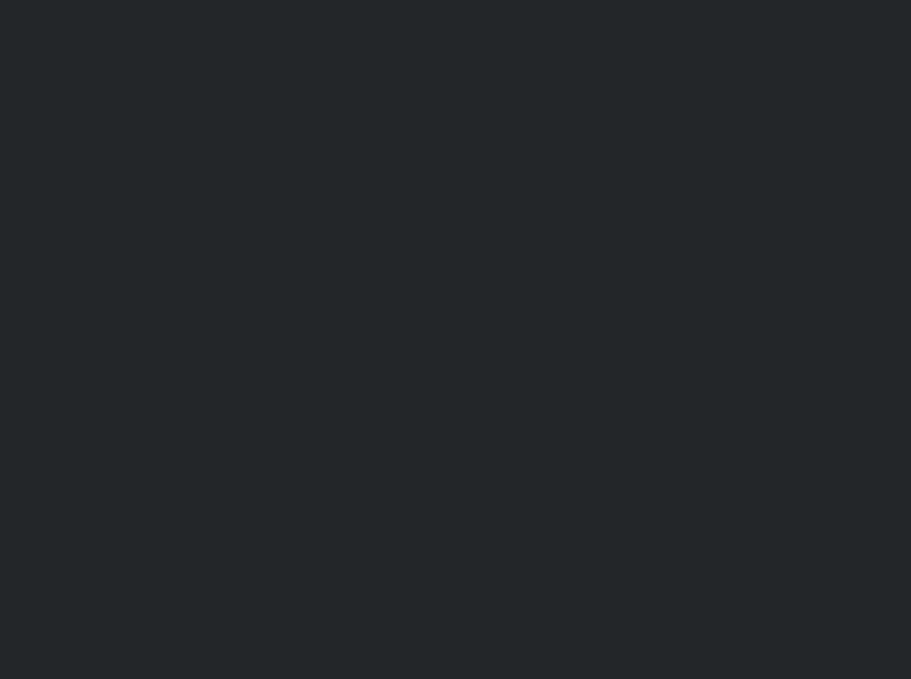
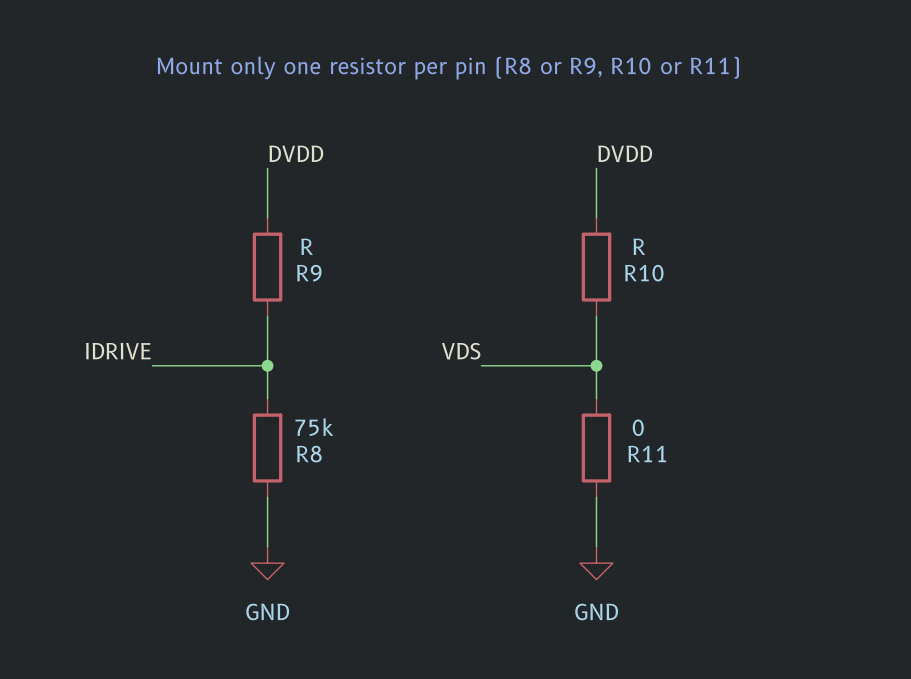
text: none -> Mount only one resistor per pin (R8 or R9, R10 or R11) (448, 68)
label: none -> DVDD (296, 153)
label: none -> DVDD (625, 153)
wire: none -> (267, 168) (267, 217)
wire: none -> (596, 168) (596, 217)
R9: none -> R (267, 267)
R10: none -> R (596, 267)
wire: none -> (267, 316) (267, 398)
wire: none -> (596, 316) (596, 398)
label: none -> IDRIVE (118, 351)
label: none -> VDS (461, 351)
wire: none -> (152, 365) (267, 365)
junction: none -> (267, 365)
wire: none -> (481, 365) (596, 365)
junction: none -> (596, 365)
R8: none -> 75k (267, 448)
R11: none -> 0 (596, 448)
wire: none -> (267, 497) (267, 546)
wire: none -> (596, 497) (596, 546)
power symbol: none -> GND (267, 563)
power symbol: none -> GND (596, 563)

